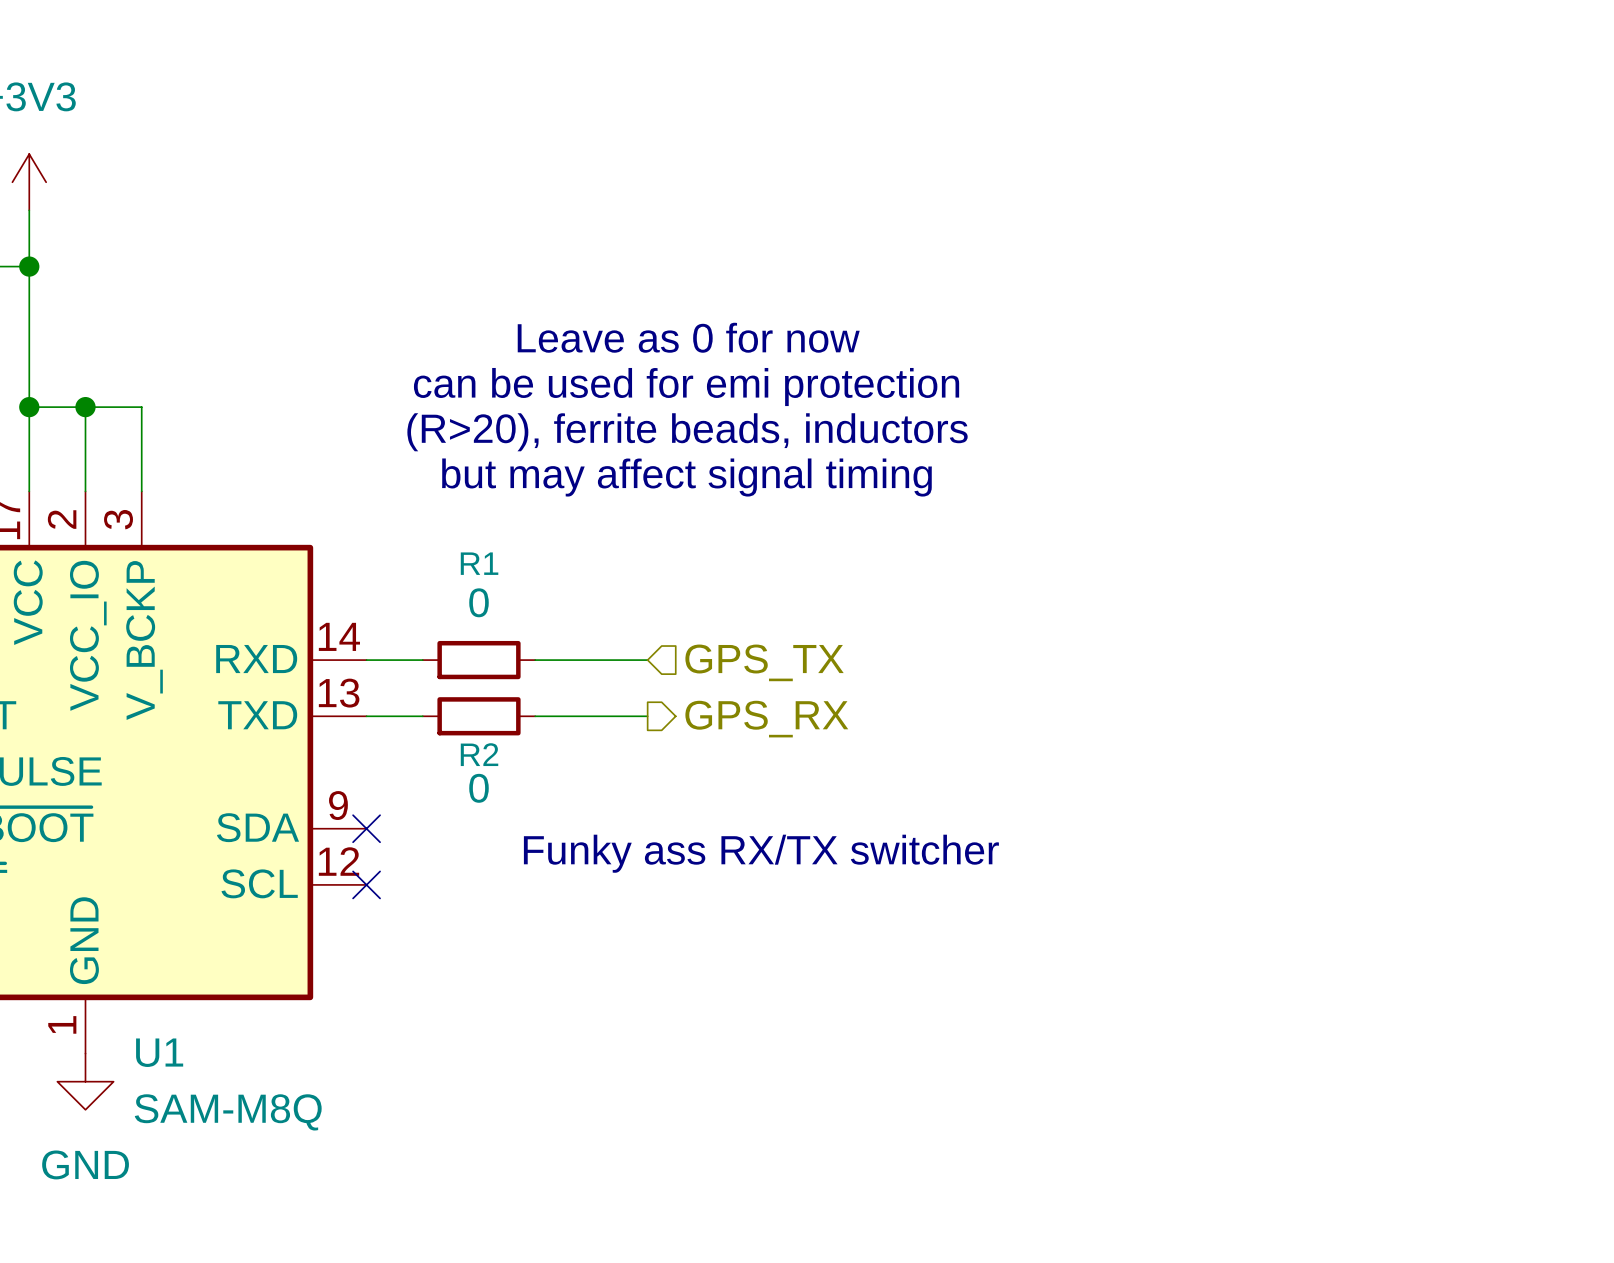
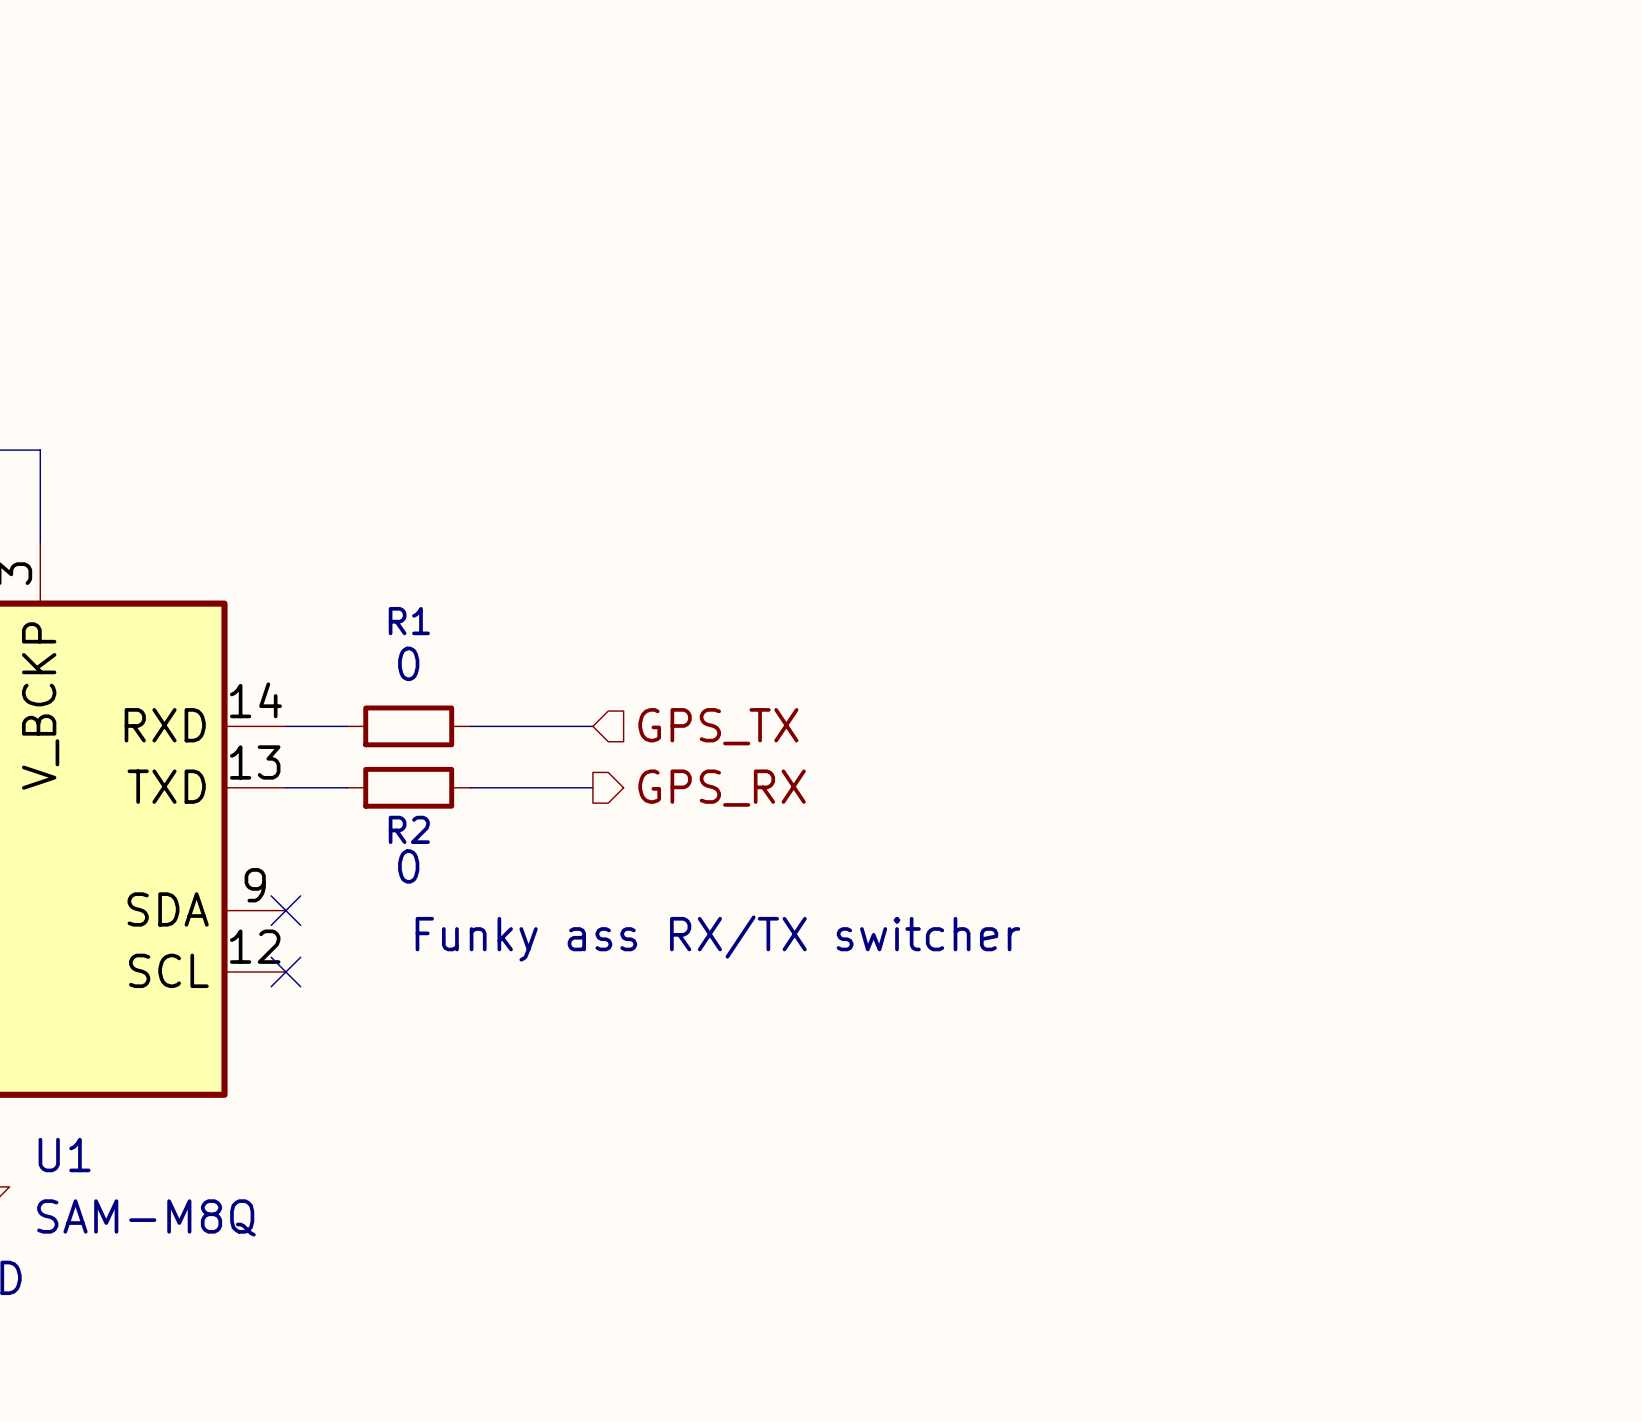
text: Leave as 0 for now (688, 337) -> none
text: can be used for emi protection (686, 387) -> none
text: (R>20), ferrite beads, inductors (687, 432) -> none
text: but may affect signal timing (686, 477) -> none

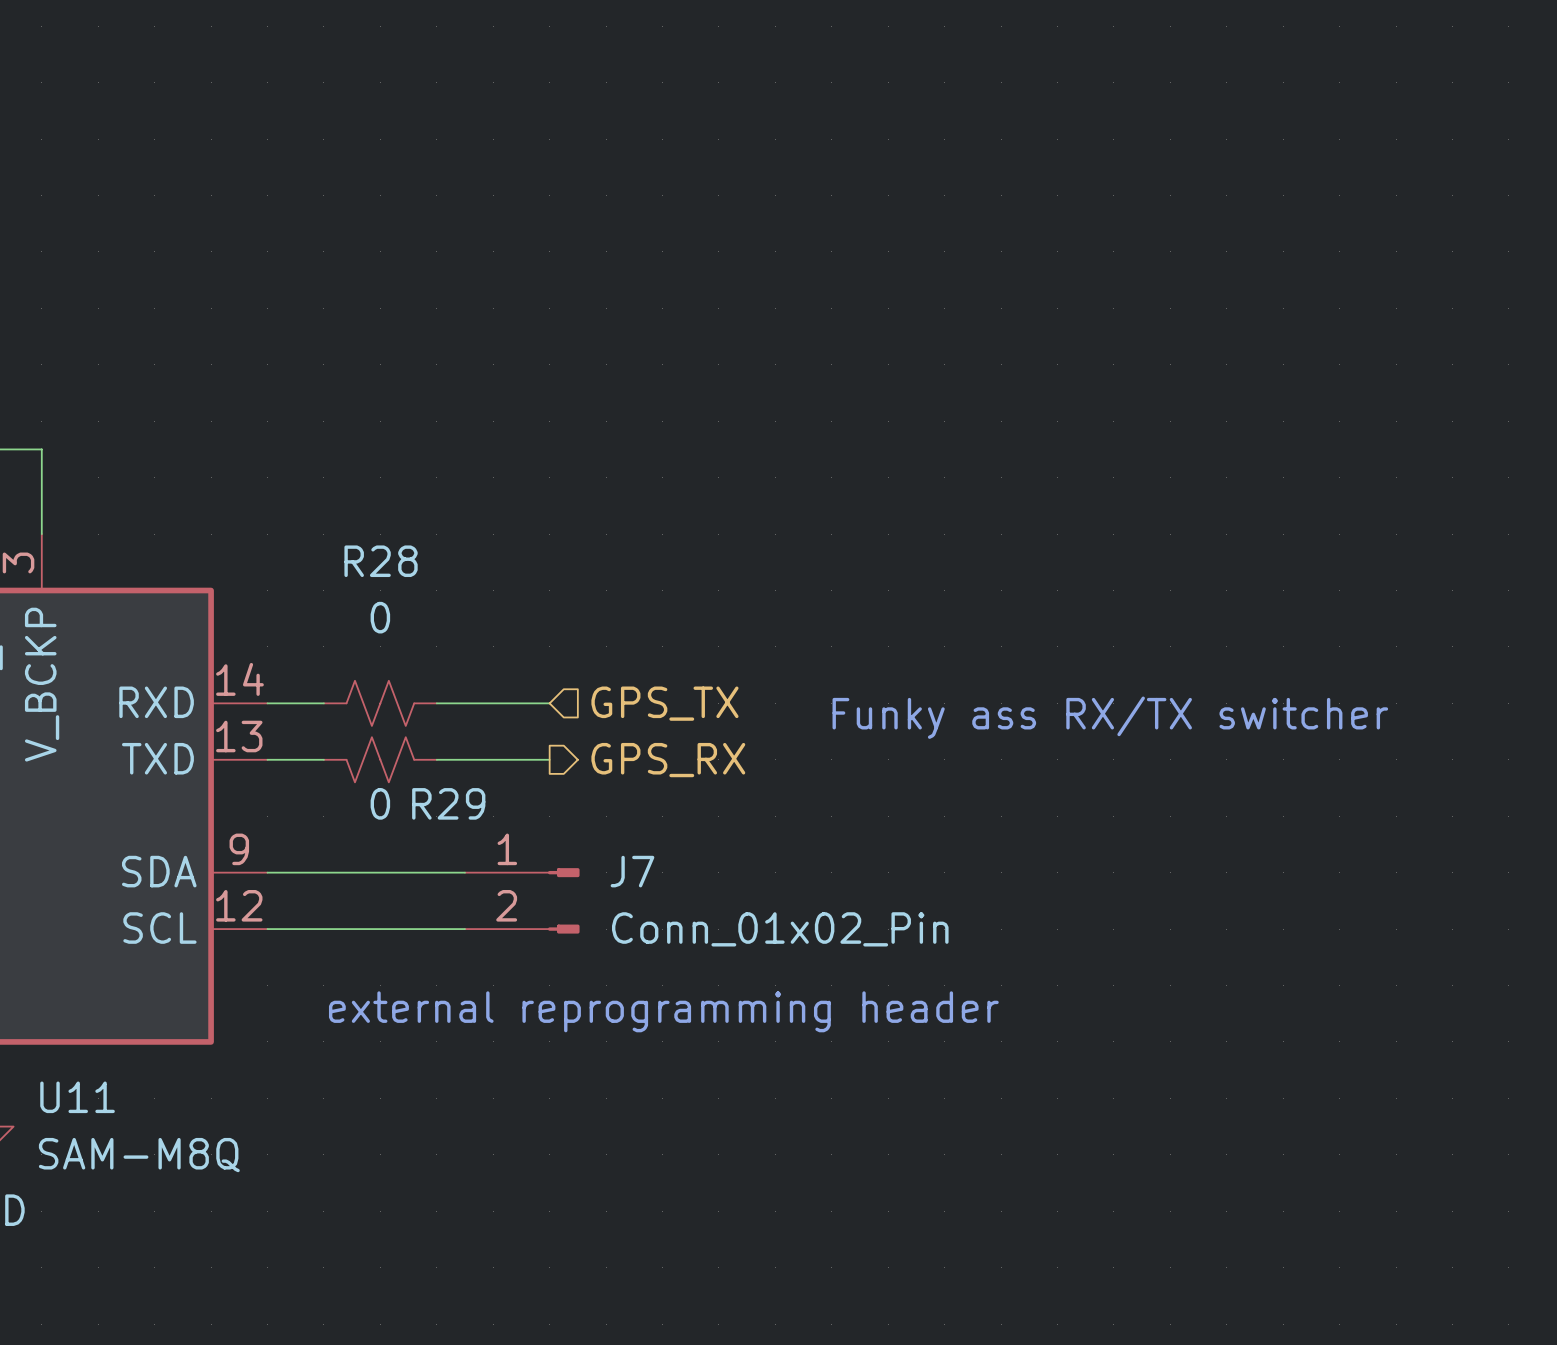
R1: 0 (408, 726) -> none
R28: none -> 0 (380, 703)
R2: 0 (408, 787) -> none
R29: none -> 0 (380, 759)
wire: none -> (267, 872) (465, 872)
no-connect mark: (285, 910) -> none
text position: Funky ass RX/TX switcher (717, 938) -> Funky ass RX/TX switcher (1110, 717)
J7: none -> Conn_01x02_Pin (522, 900)
wire: none -> (267, 929) (465, 929)
no-connect mark: (285, 972) -> none
text: none -> external reprogramming header (663, 1011)
U1 name: U1 (64, 1155) -> U11 (77, 1097)

